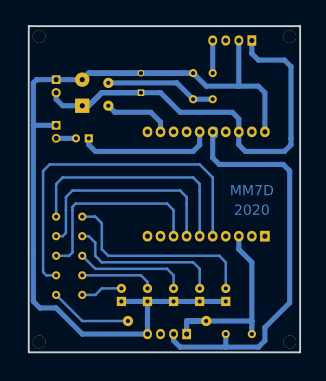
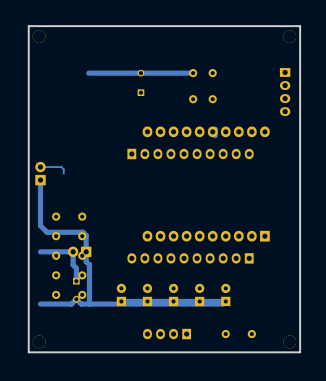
track: (212, 40) (212, 73) -> none
part: (232, 40) -> none
track: (238, 40) (238, 86) -> none
track: (251, 40) (251, 53) (258, 60) (284, 60) (290, 66) (290, 144) (284, 151) (245, 151) (238, 144) (238, 118) (232, 112) (180, 112) (160, 92) (101, 92) (88, 105) (62, 105) (56, 99) (56, 92) -> none
track: (108, 82) (176, 82) (193, 99) (212, 99) -> none
part: (108, 82) -> none
part: (56, 86) -> none
part: (82, 92) -> none
part: none -> (285, 92)
track: (108, 105) (114, 112) (150, 112) (160, 122) (160, 131) -> none
part: (108, 105) -> none
track: (56, 125) (33, 125) -> none
part: (56, 131) -> none
track: (199, 131) (199, 144) (193, 151) (95, 151) (88, 144) (88, 138) -> none
track: (212, 131) (212, 157) (219, 164) (283, 164) (289, 170) (289, 302) (264, 327) (264, 340) (258, 347) (180, 347) (173, 340) (173, 334) -> none
track: (264, 131) (264, 92) (258, 86) (206, 86) (193, 73) (88, 73) (82, 79) (36, 79) (33, 82) (33, 301) (39, 307) (56, 307) (82, 334) (147, 334) (147, 301) -> none
track: (75, 138) (56, 138) -> none
part: (82, 138) -> none
part: none -> (190, 154)
track: none -> (40, 167) (61, 167) (63, 173)
part: none -> (40, 173)
track: none -> (40, 180) (40, 225) (47, 232) (82, 232) (86, 235) (86, 261) (89, 264) (89, 304)
text: MM7D (252, 190) -> none
text: 2020 (251, 209) -> none
track: (56, 216) (56, 184) (62, 177) (193, 177) (199, 184) (199, 236) -> none
track: (82, 216) (95, 216) (101, 223) (101, 249) (108, 255) (219, 255) (225, 262) (225, 288) -> none
track: (82, 236) (88, 236) (95, 242) (95, 255) (101, 262) (193, 262) (199, 268) (199, 288) -> none
track: (173, 236) (173, 210) (167, 203) (75, 203) (72, 206) (72, 252) (69, 255) (56, 255) -> none
track: (186, 236) (186, 197) (180, 190) (72, 190) (65, 197) (65, 232) (62, 236) (56, 236) -> none
track: (212, 236) (212, 177) (199, 164) (49, 164) (43, 170) (43, 272) (46, 275) (56, 275) -> none
track: (238, 236) (238, 249) (251, 262) (251, 334) -> none
track: none -> (40, 251) (73, 251) (76, 281)
part: none -> (79, 251)
track: (82, 255) (95, 268) (167, 268) (173, 275) (173, 288) -> none
part: none -> (190, 258)
track: (82, 275) (140, 275) (147, 281) (147, 288) -> none
track: (121, 288) (101, 288) (95, 294) (82, 294) -> none
part: none -> (76, 290)
track: (56, 294) (82, 321) (127, 321) -> none
track: none -> (223, 304) (81, 304) (76, 299) (71, 304) (40, 304)
part: (127, 321) -> none
part: (206, 321) -> none
track: (251, 321) (186, 321) (186, 334) -> none
track: (225, 334) (225, 347) -> none

